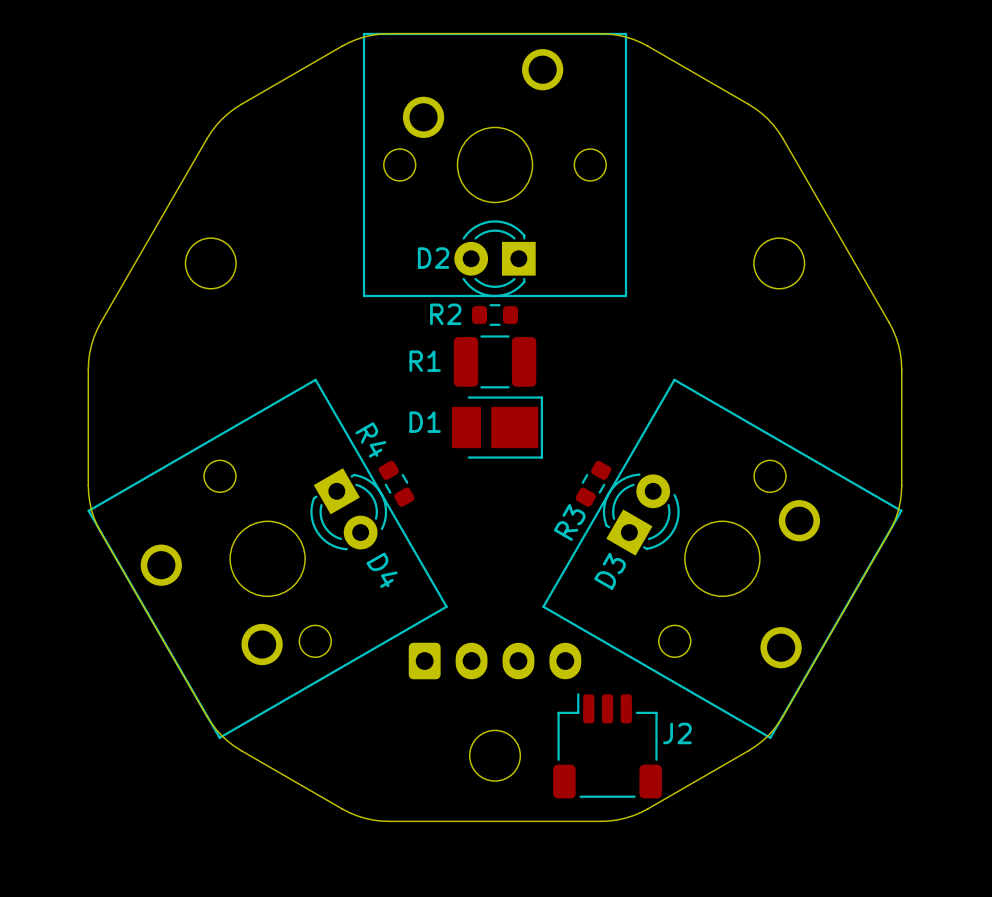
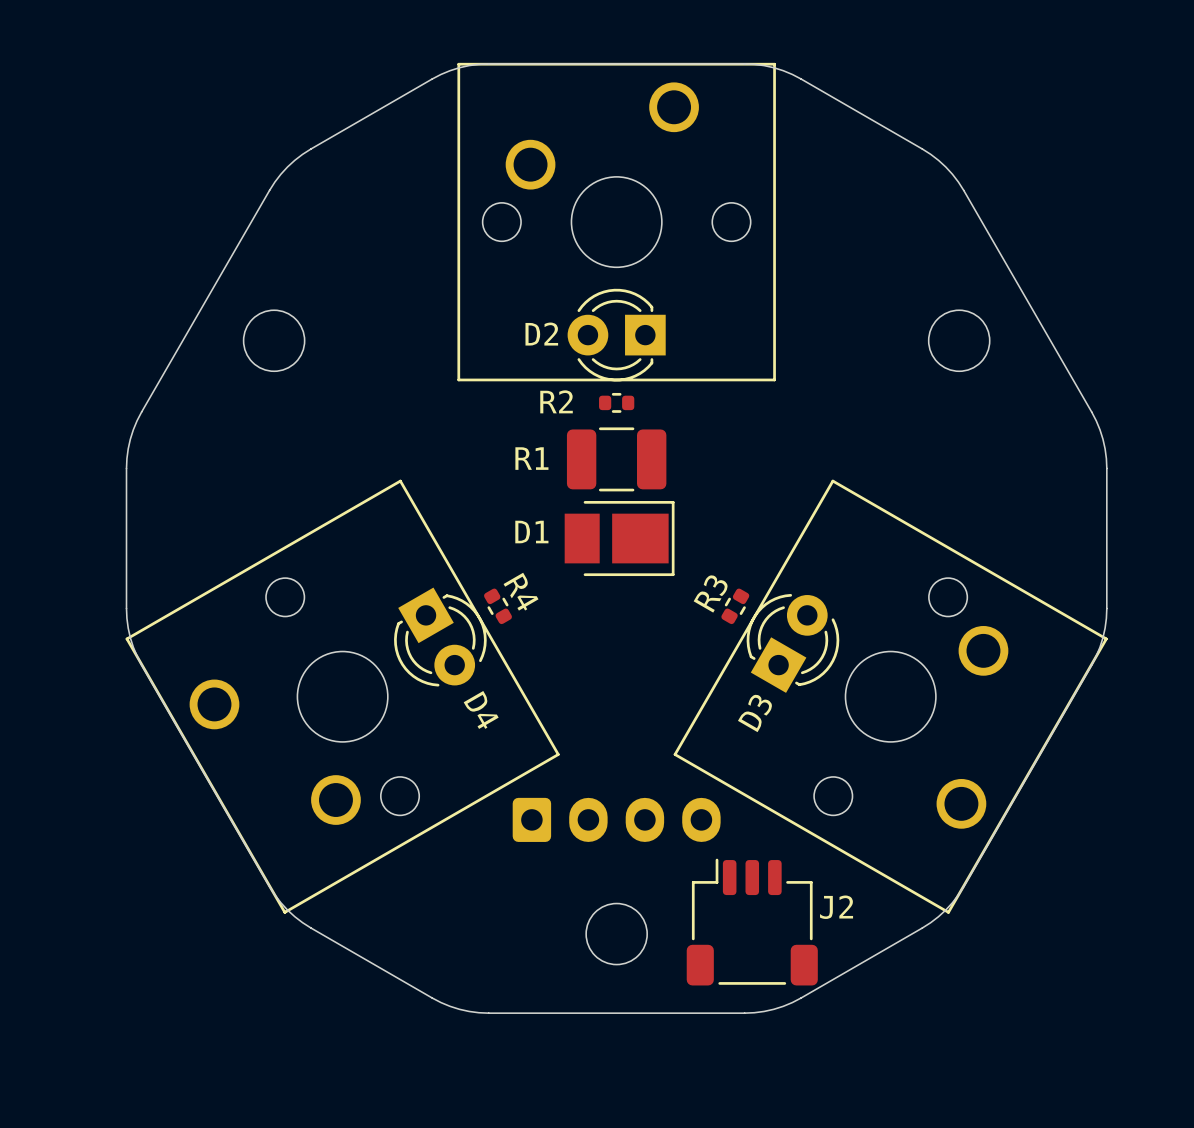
R2 footprint: [472, 304, 518, 326] -> [599, 392, 635, 413]
R4 name position: R4 (370, 439) -> R4 (521, 591)
R4 footprint: [378, 460, 415, 507] -> [484, 588, 512, 625]
R3 footprint: [575, 460, 612, 507] -> [721, 588, 750, 625]
R3 name position: R3 (569, 522) -> R3 (710, 593)

